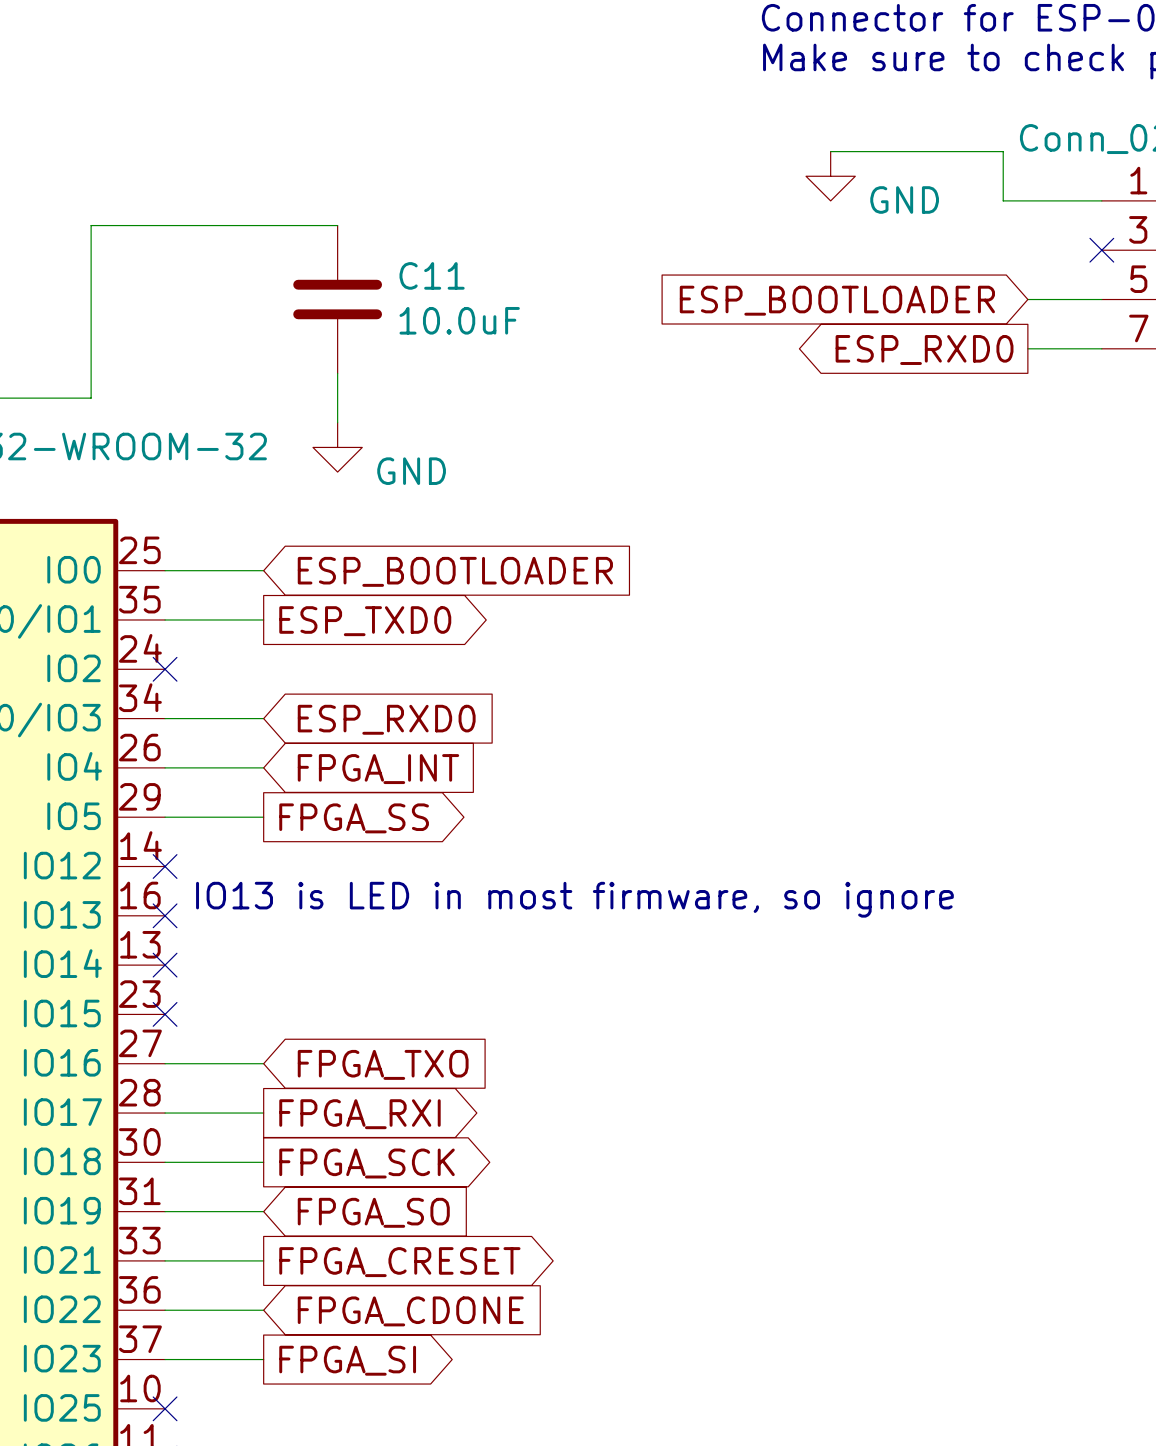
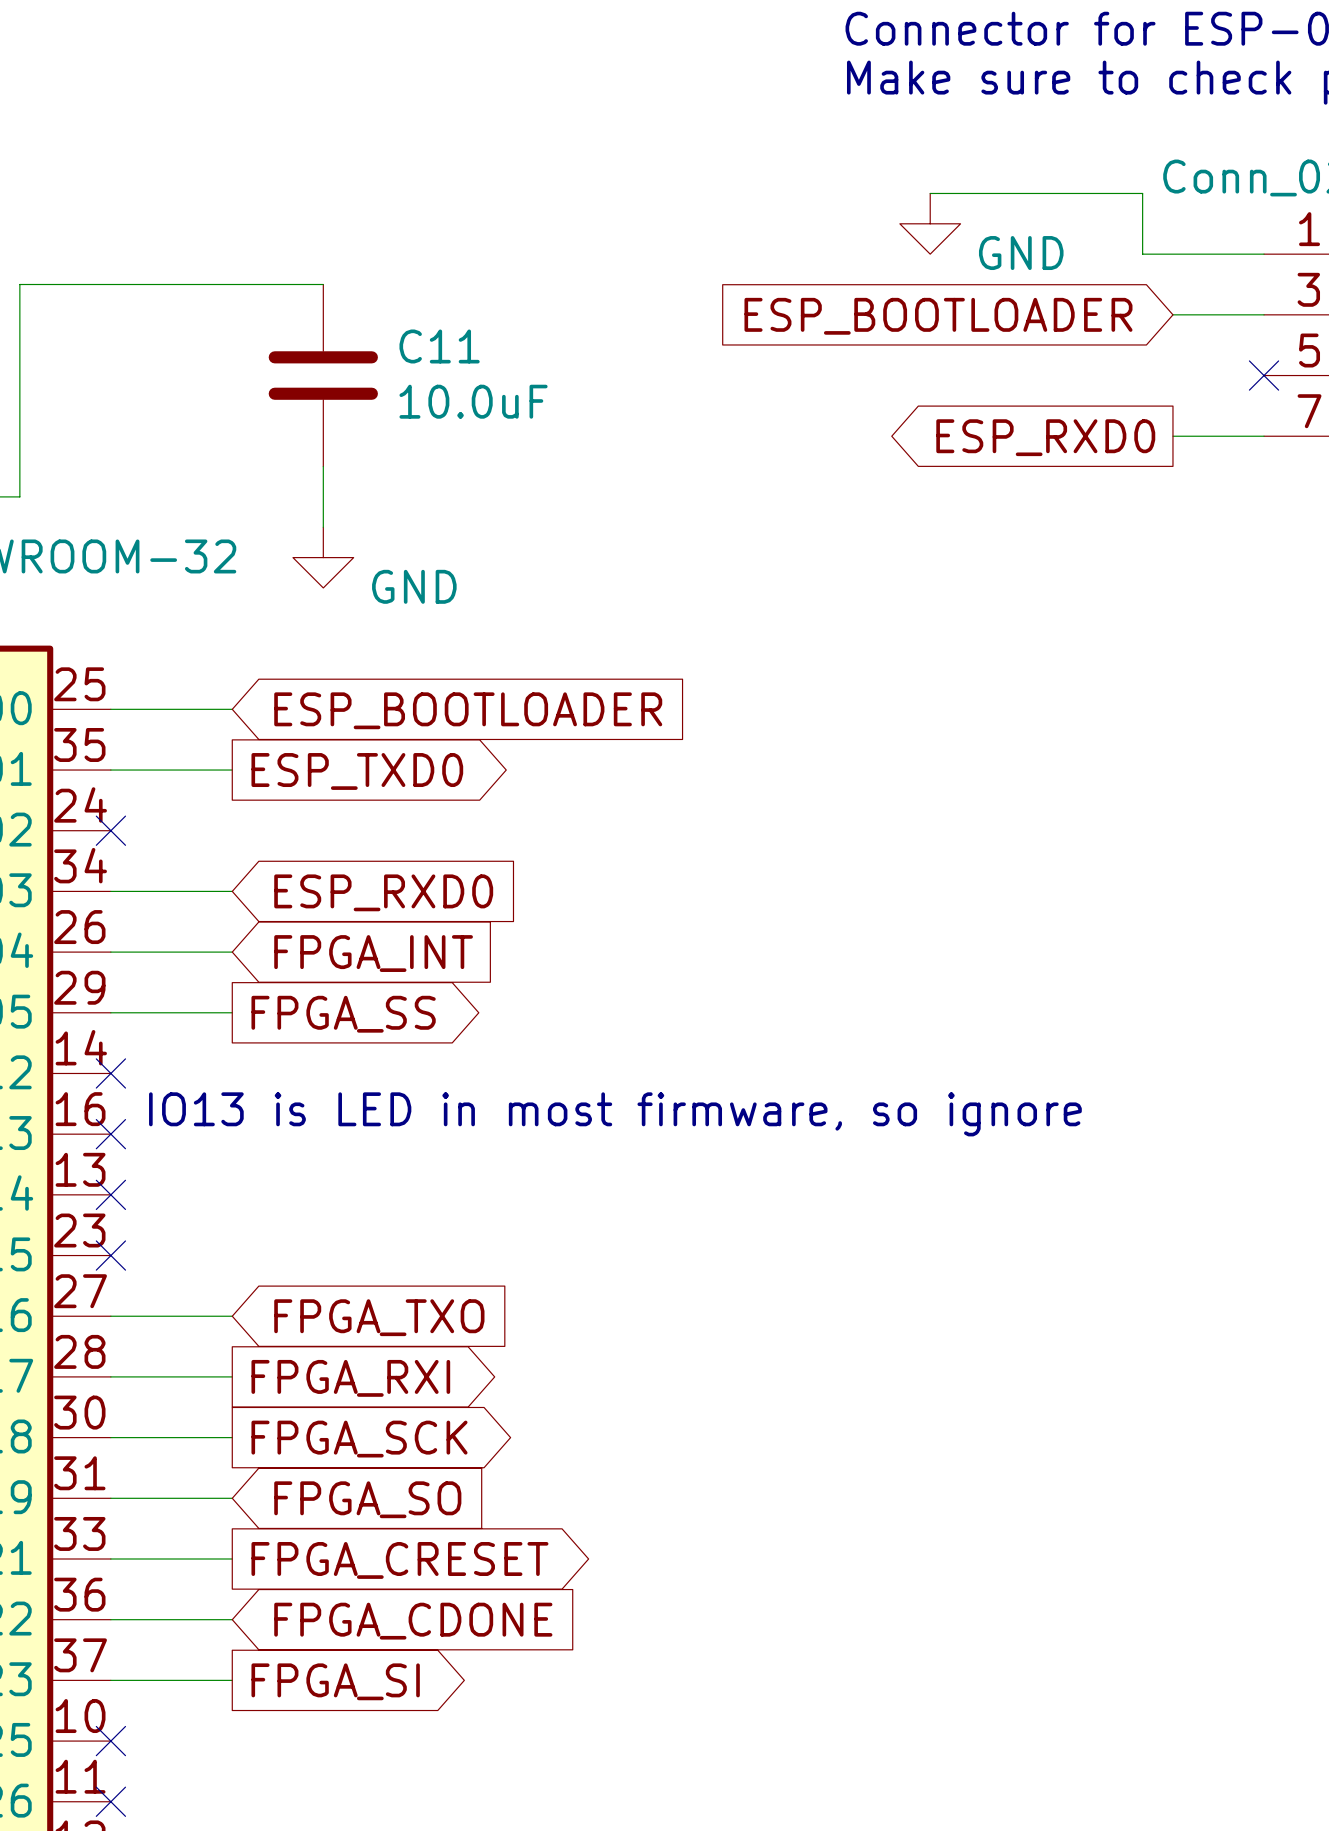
no-connect mark position: (1101, 250) -> (1264, 375)
wire: (1027, 299) (1101, 299) -> (1172, 314) (1264, 314)
global label position: ESP_BOOTLOADER (837, 300) -> ESP_BOOTLOADER (938, 316)

